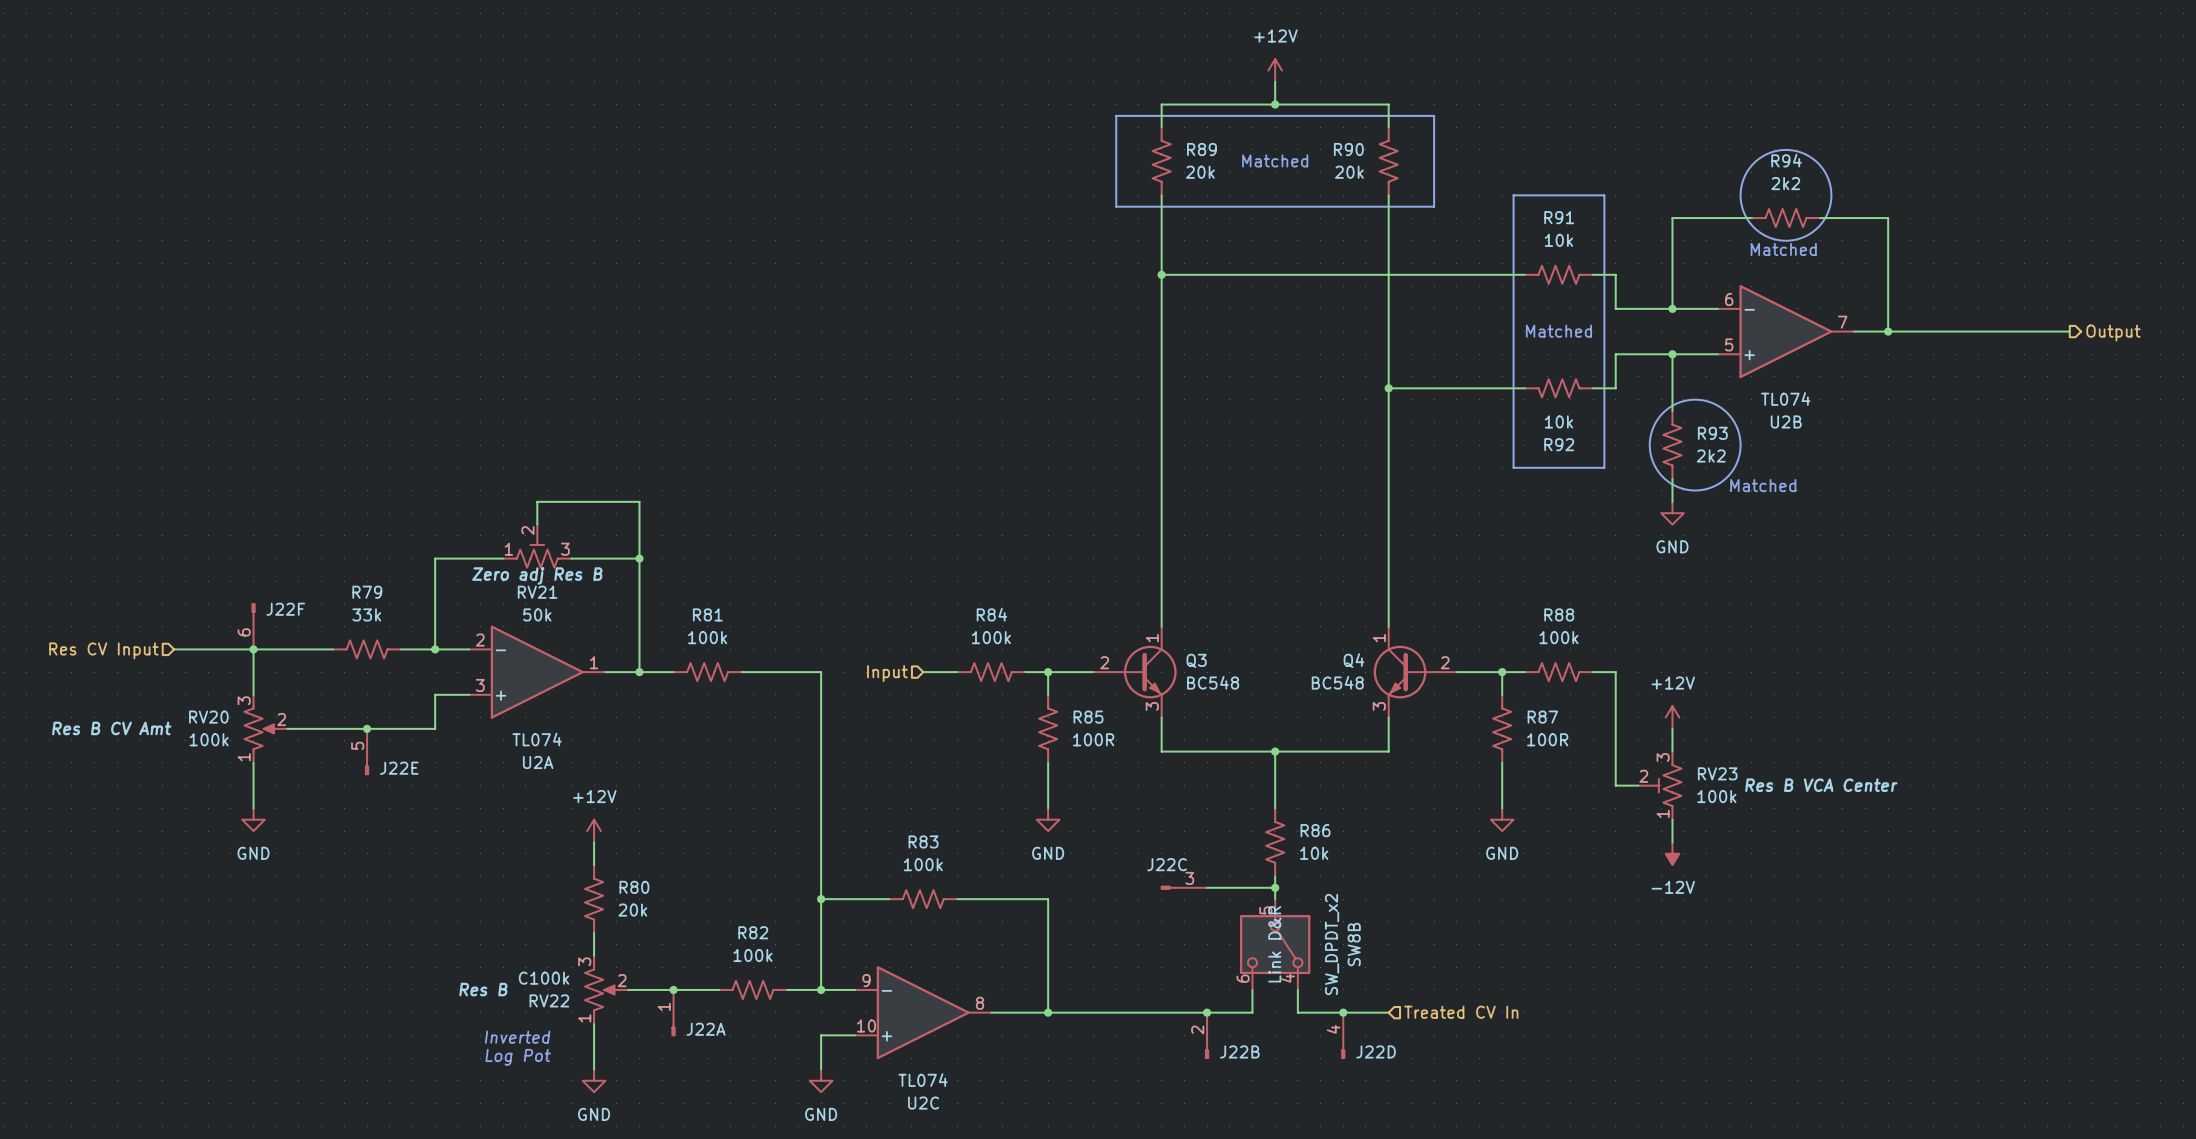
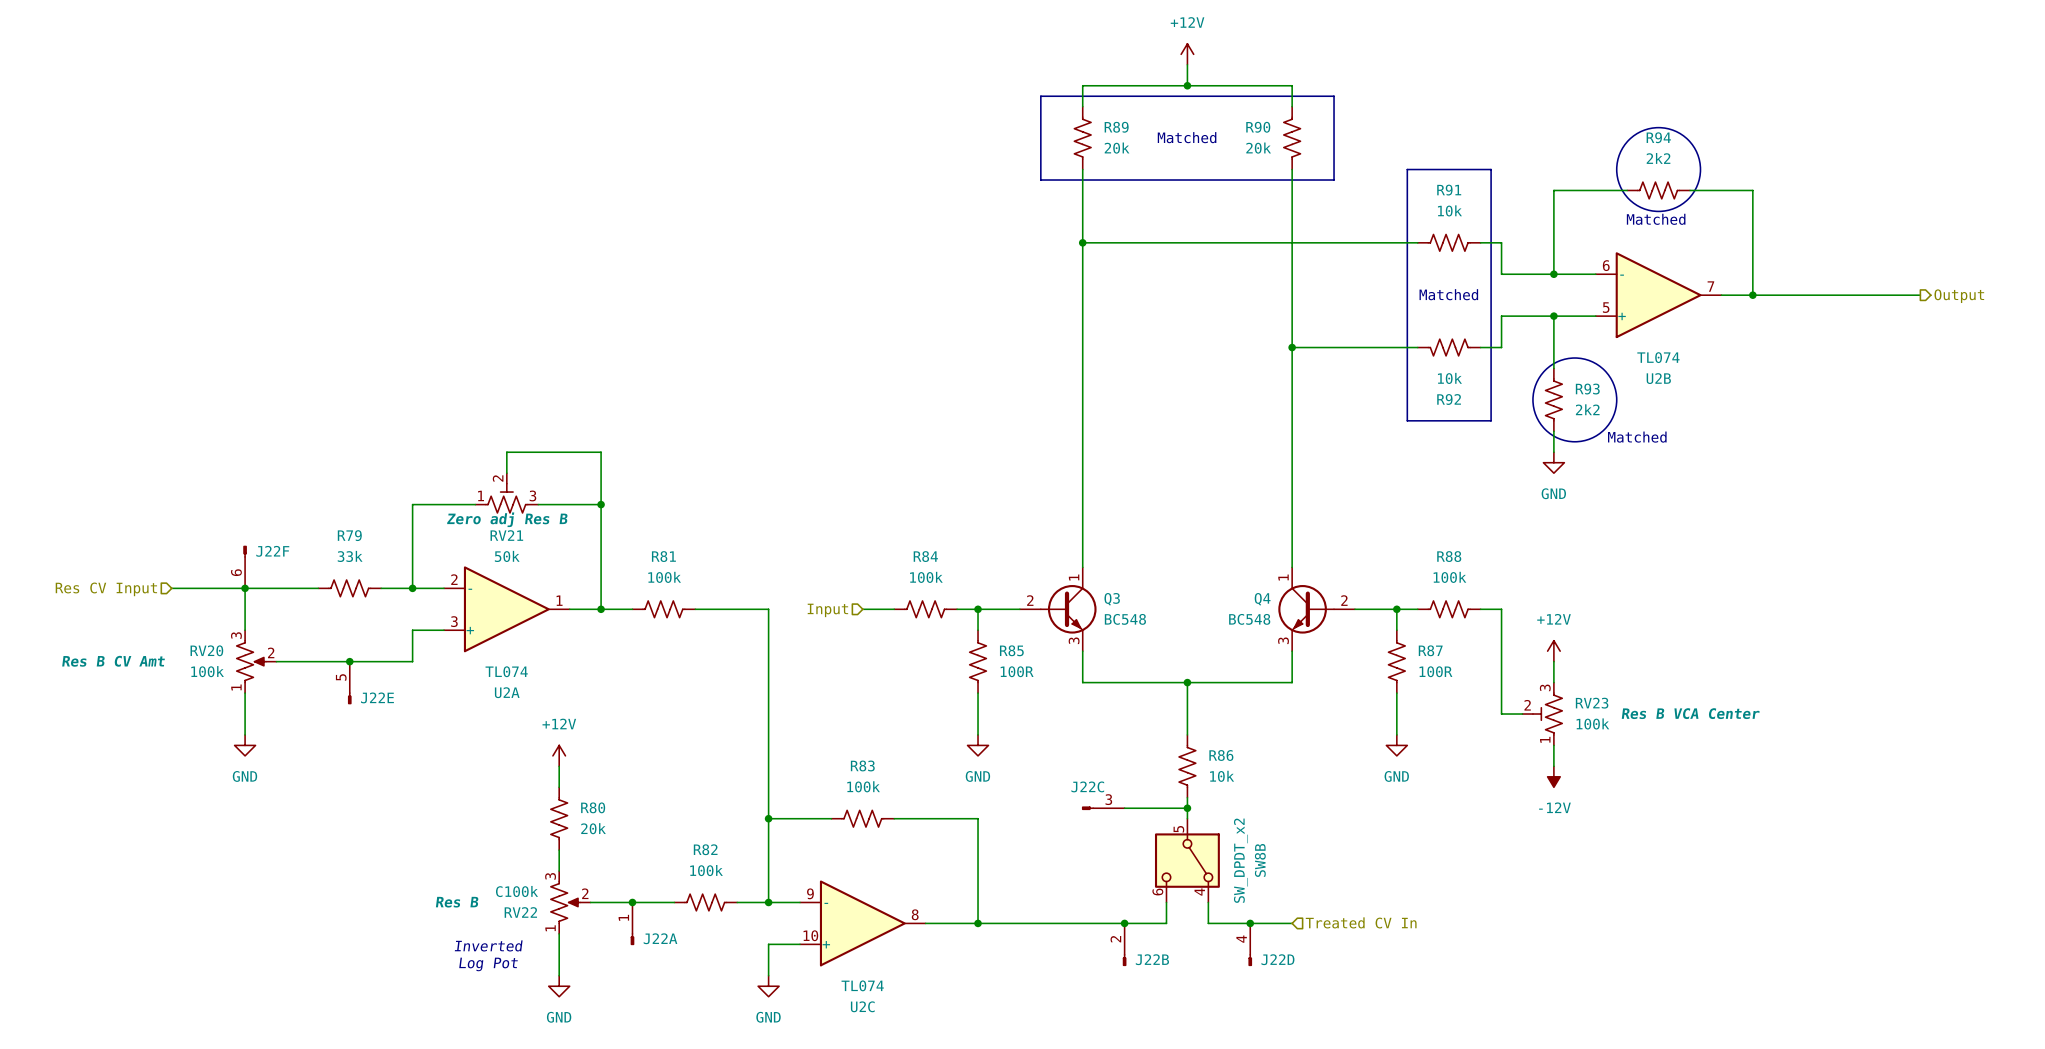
SW8B text: Link D&R (1274, 944) -> none

